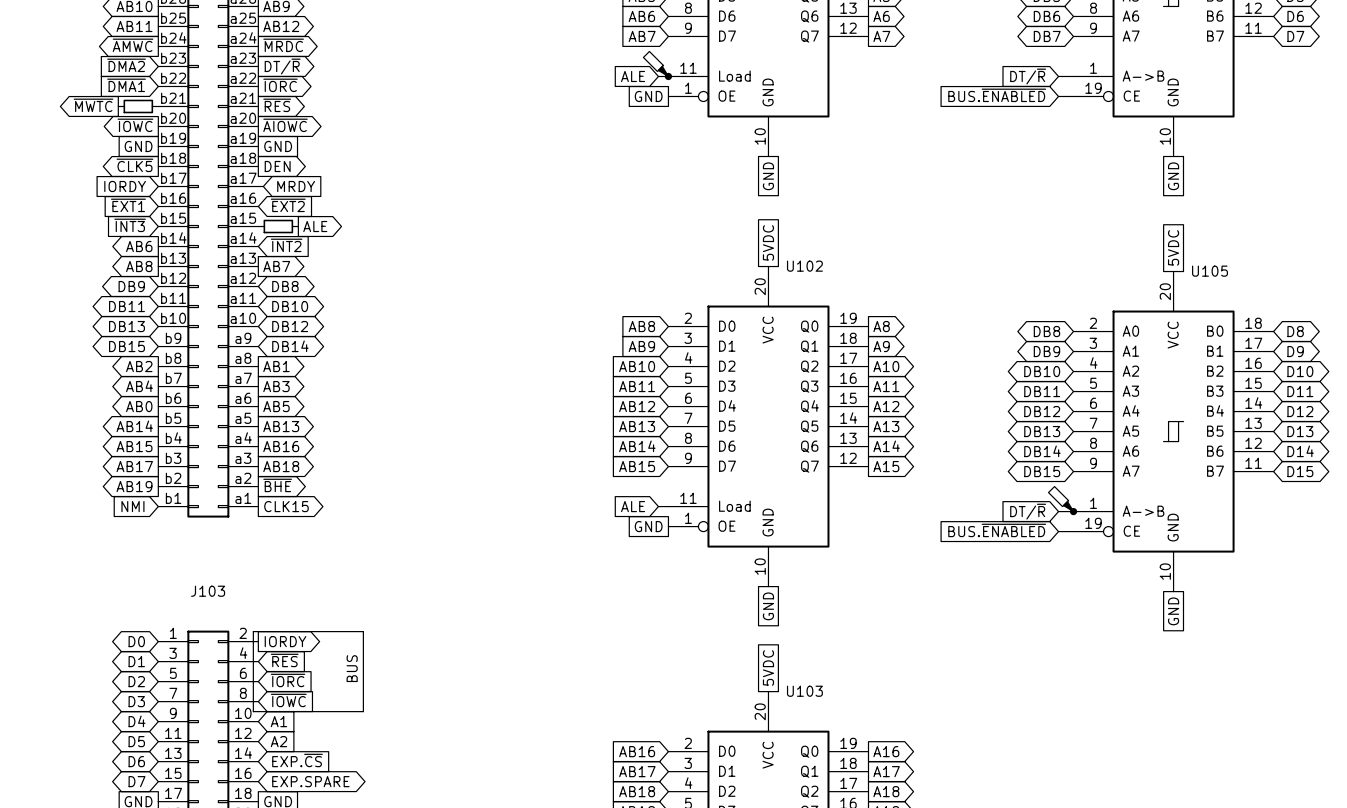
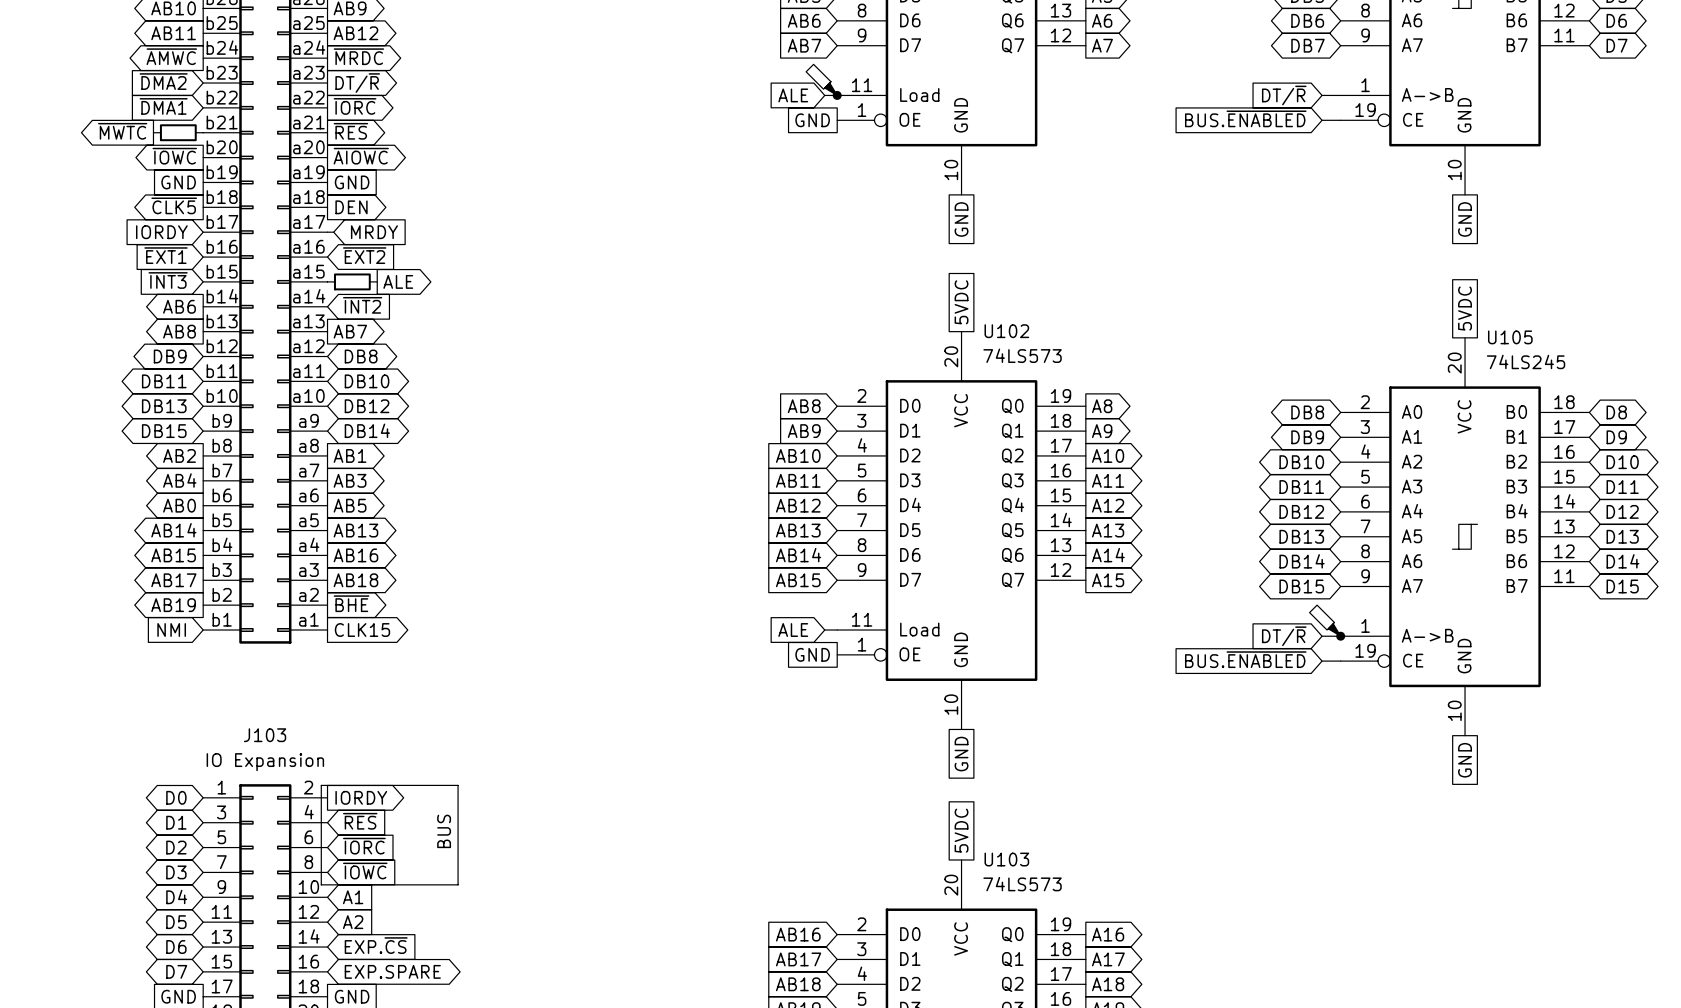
U102 value: none -> 74LS573 (1022, 355)
U105 value: none -> 74LS245 (1526, 361)
J103 value: none -> IO Expansion (265, 762)
U103 value: none -> 74LS573 (1022, 884)

